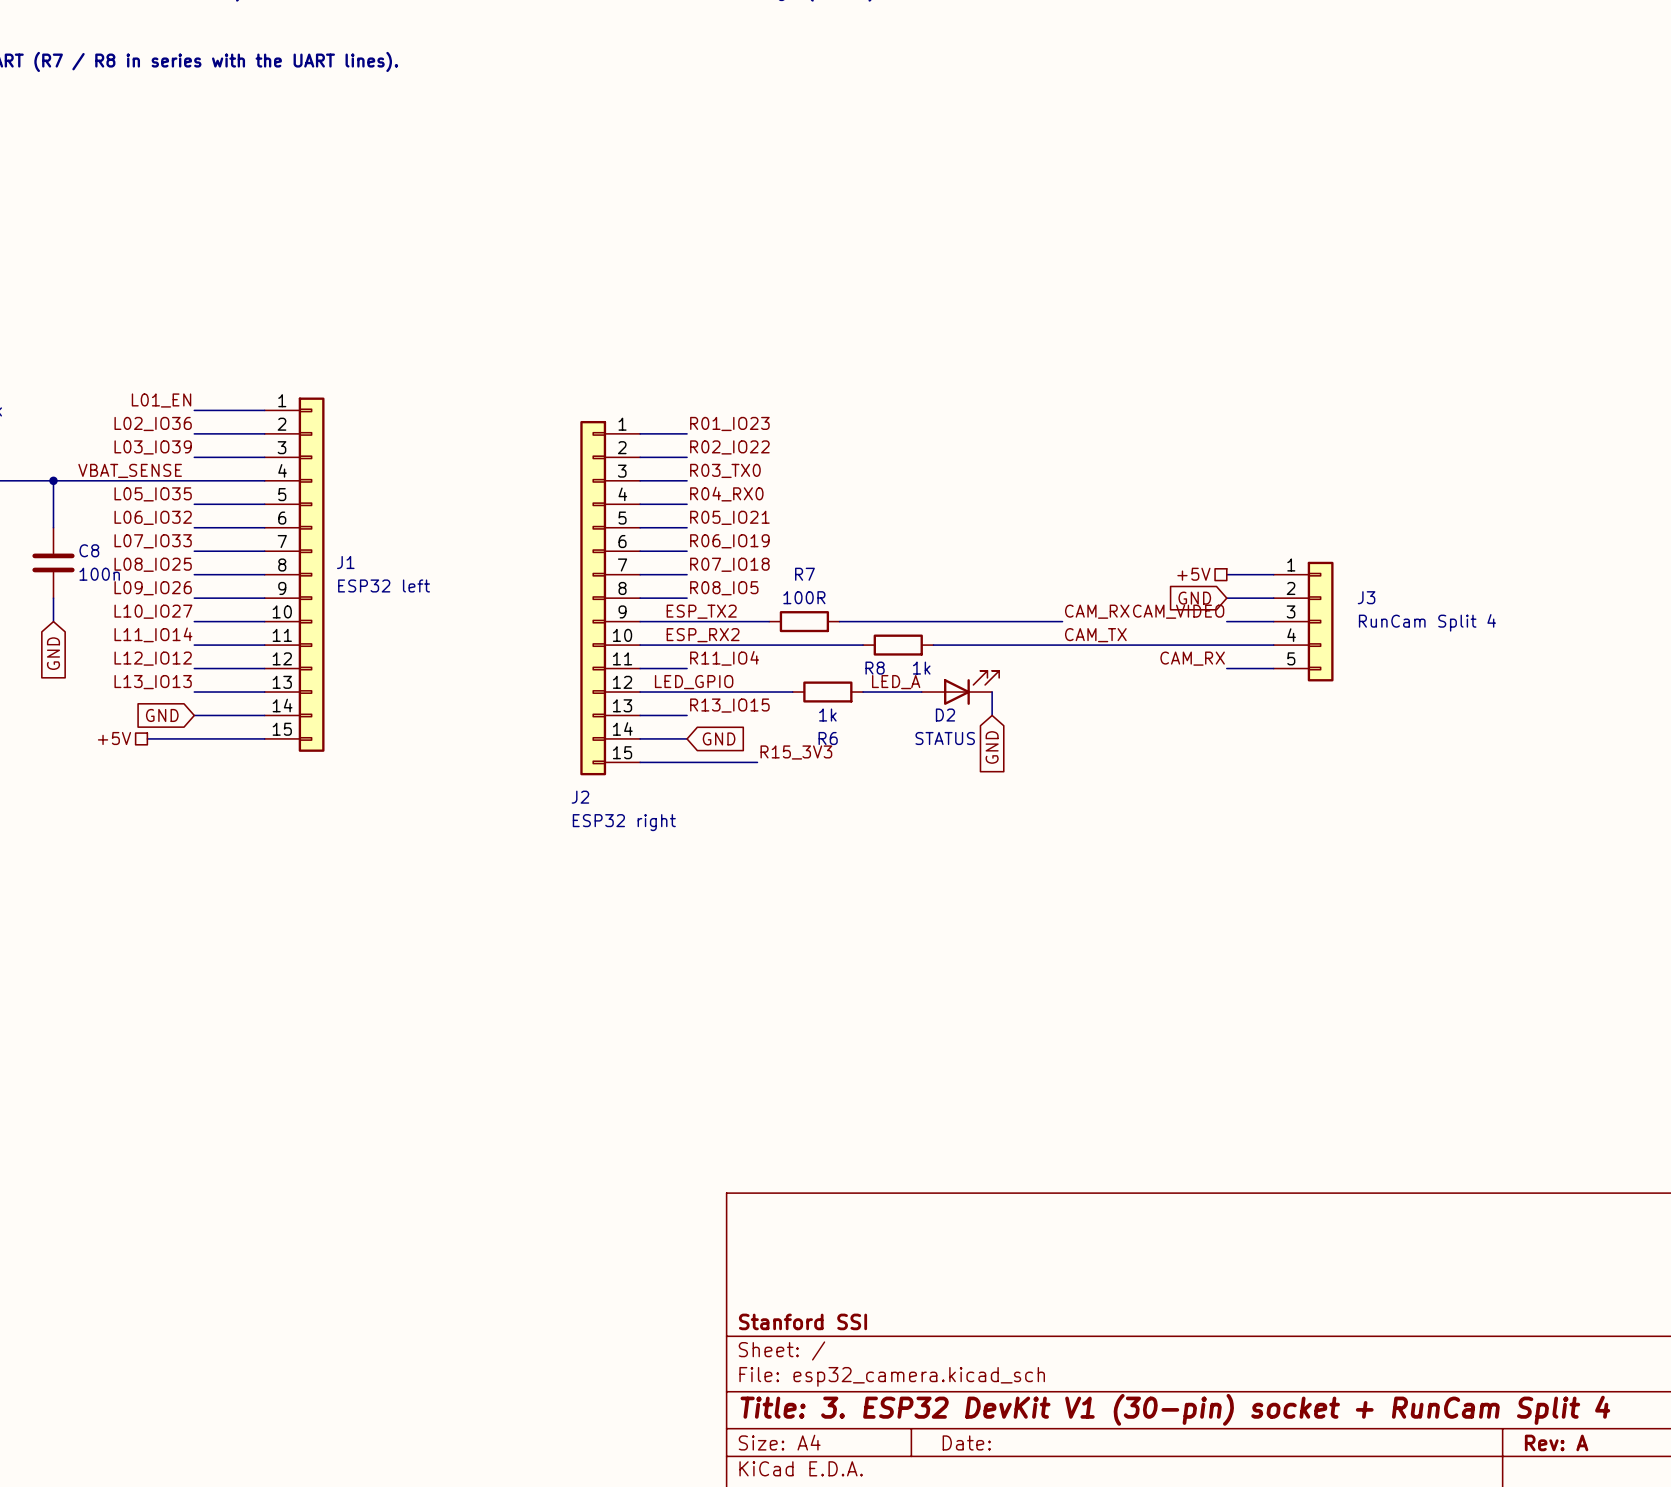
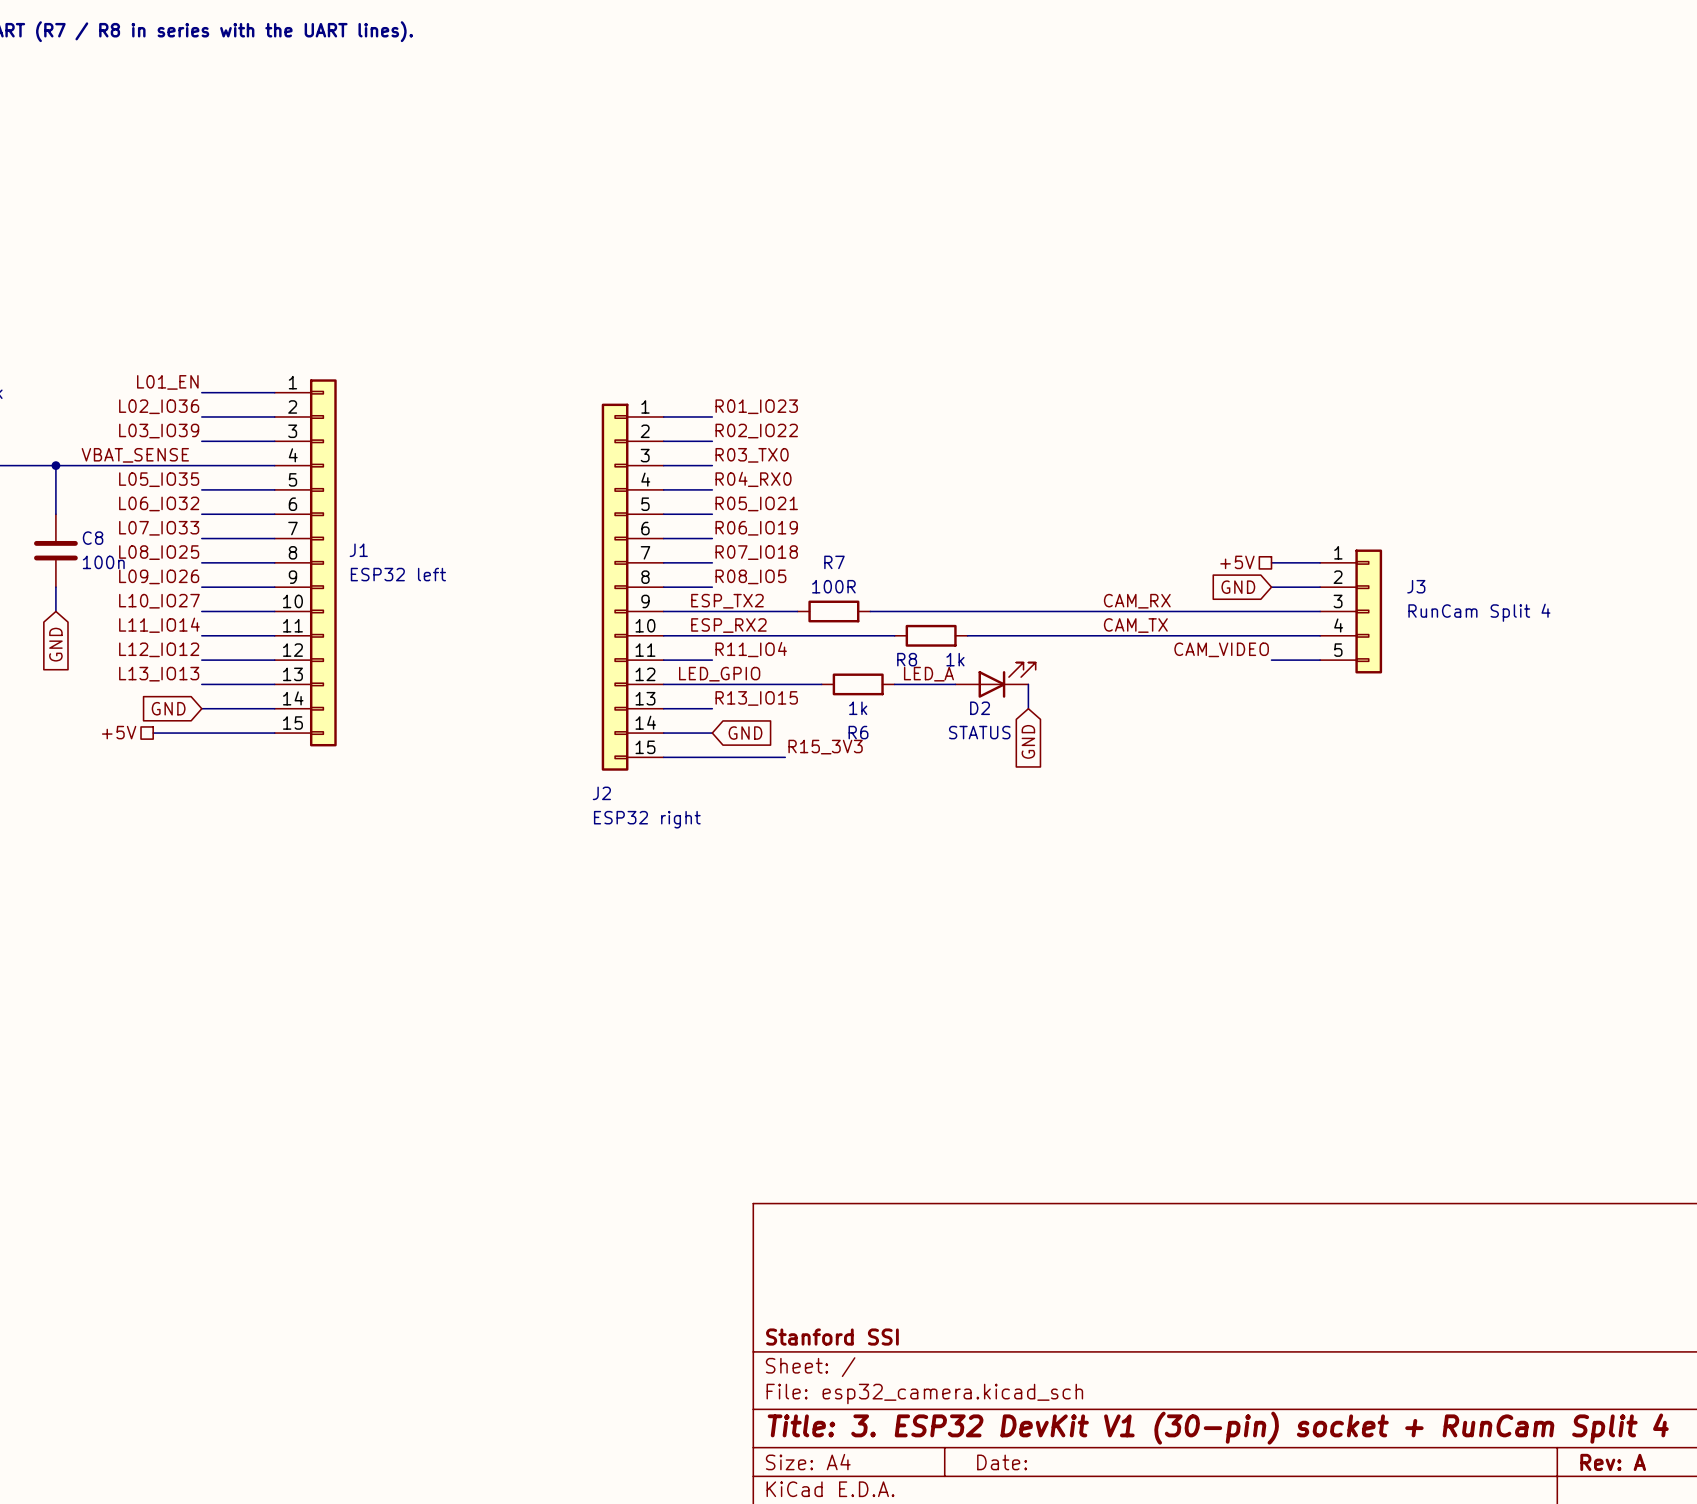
label: CAM_VIDEO (1178, 611) -> none
wire: none -> (1101, 611) (1271, 611)
label: CAM_RX (1192, 658) -> CAM_VIDEO (1221, 649)

